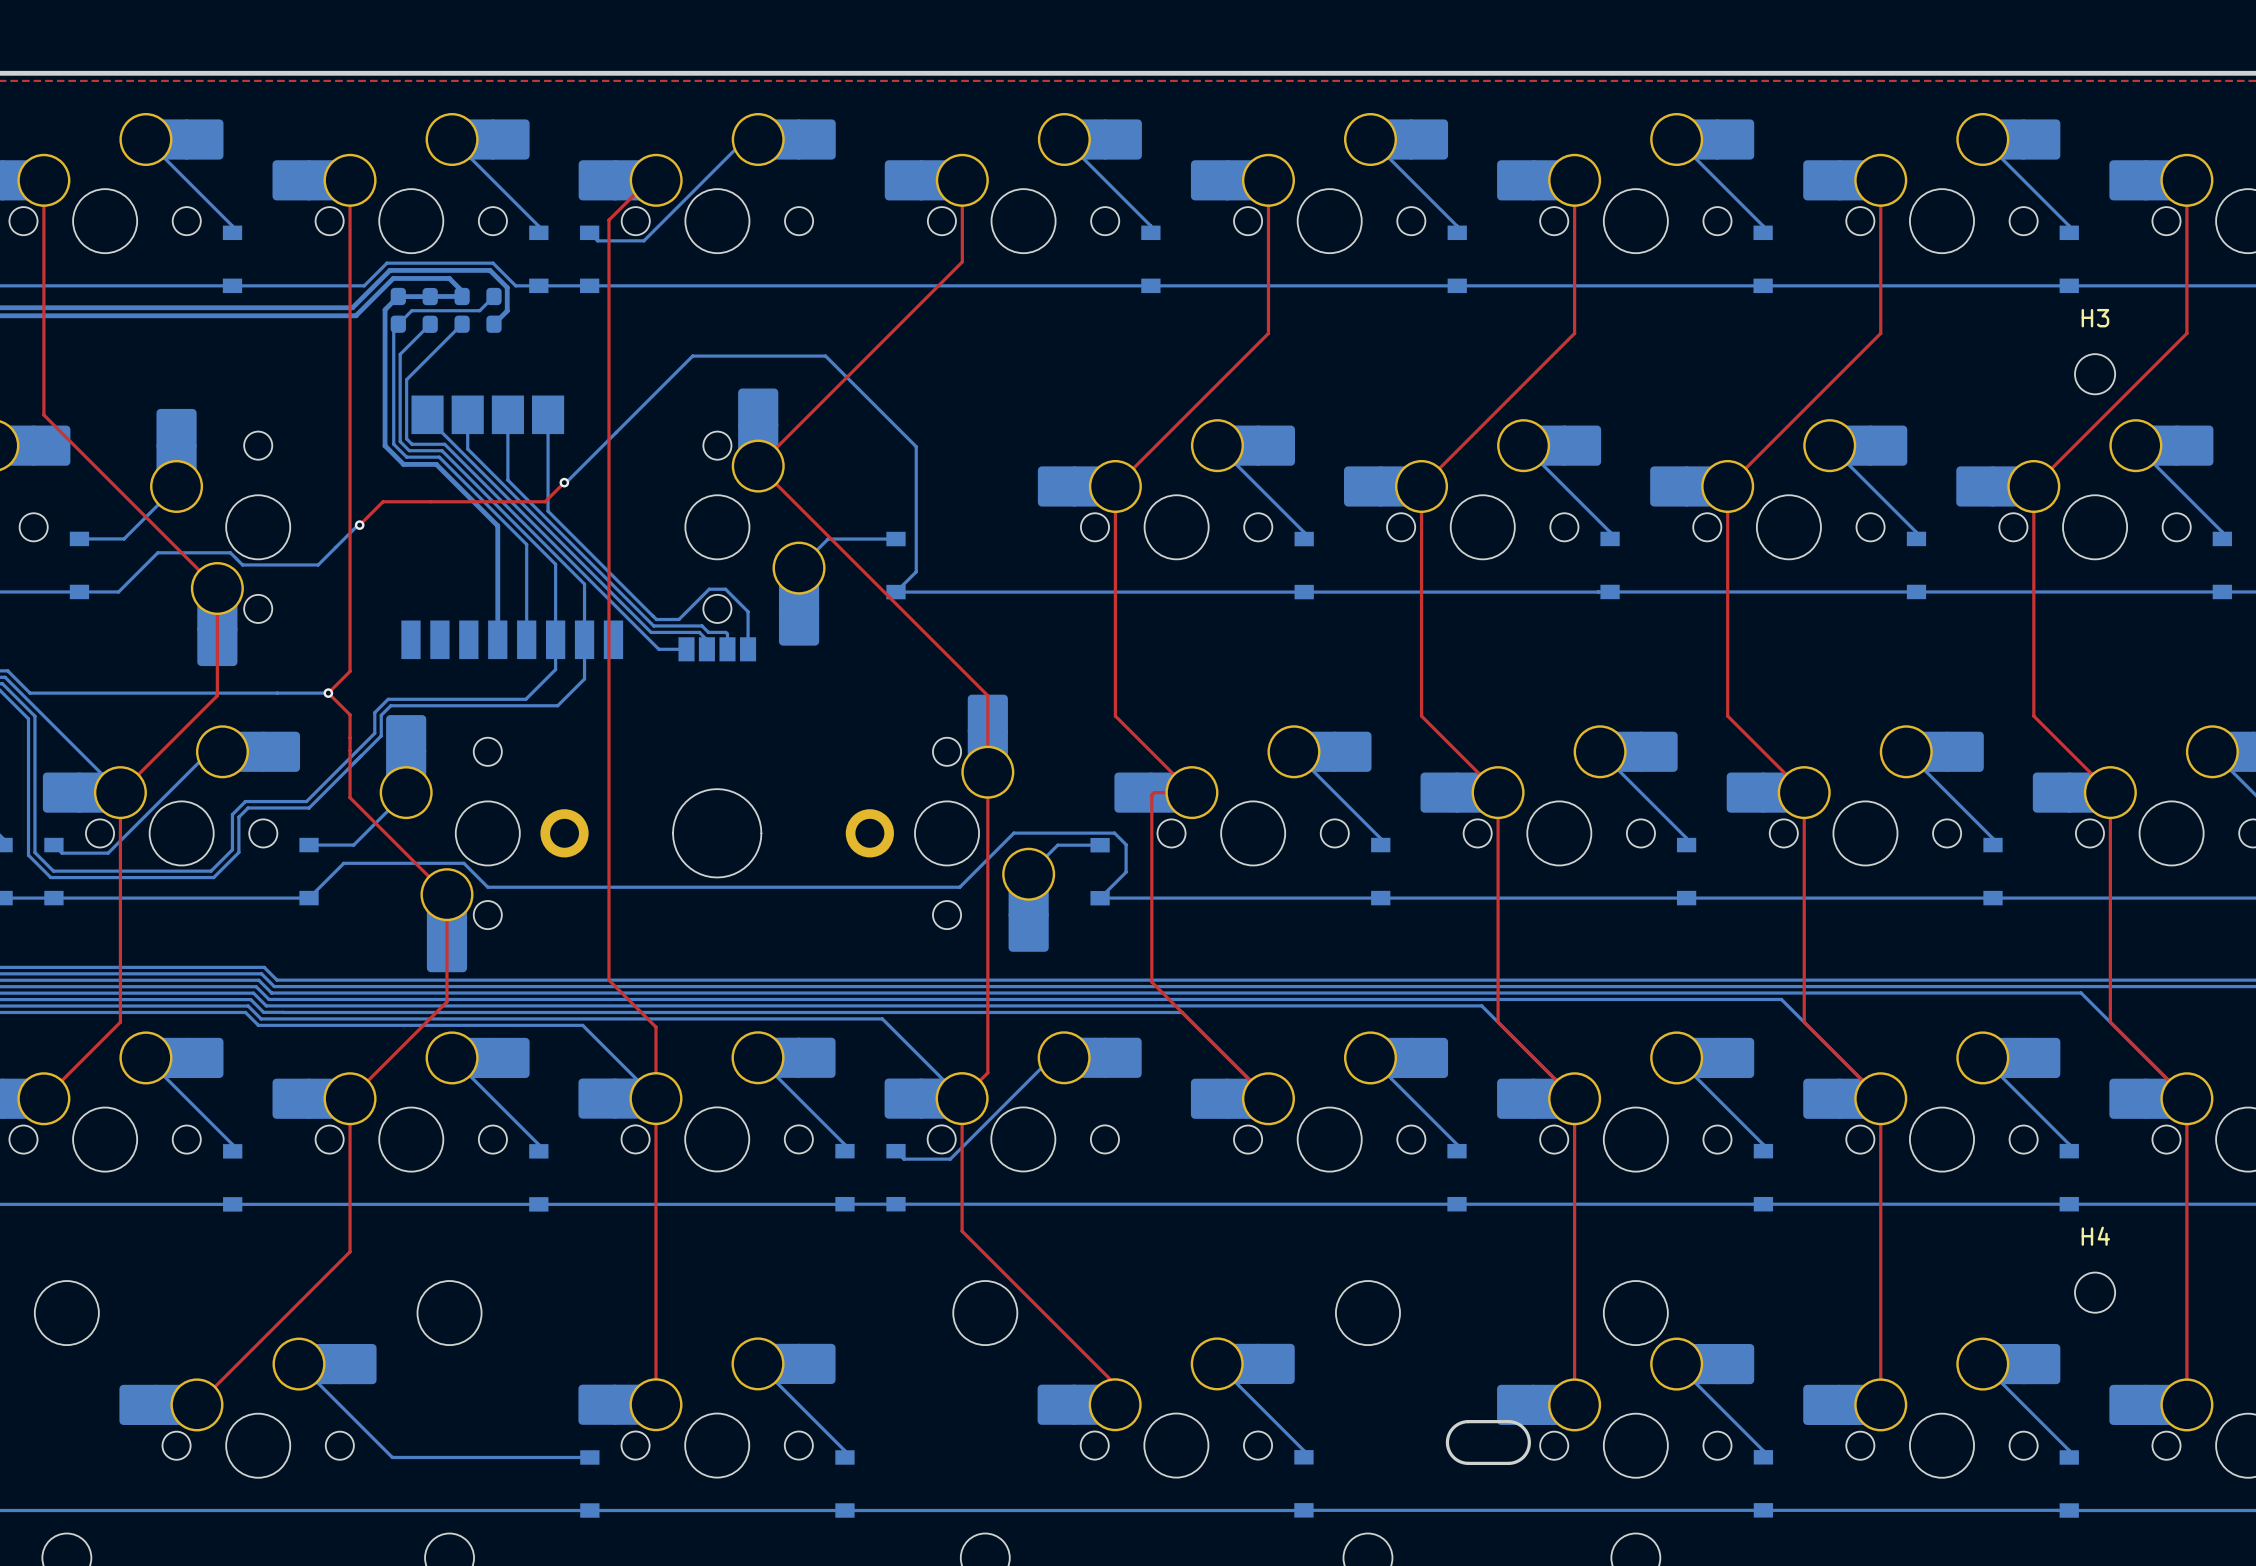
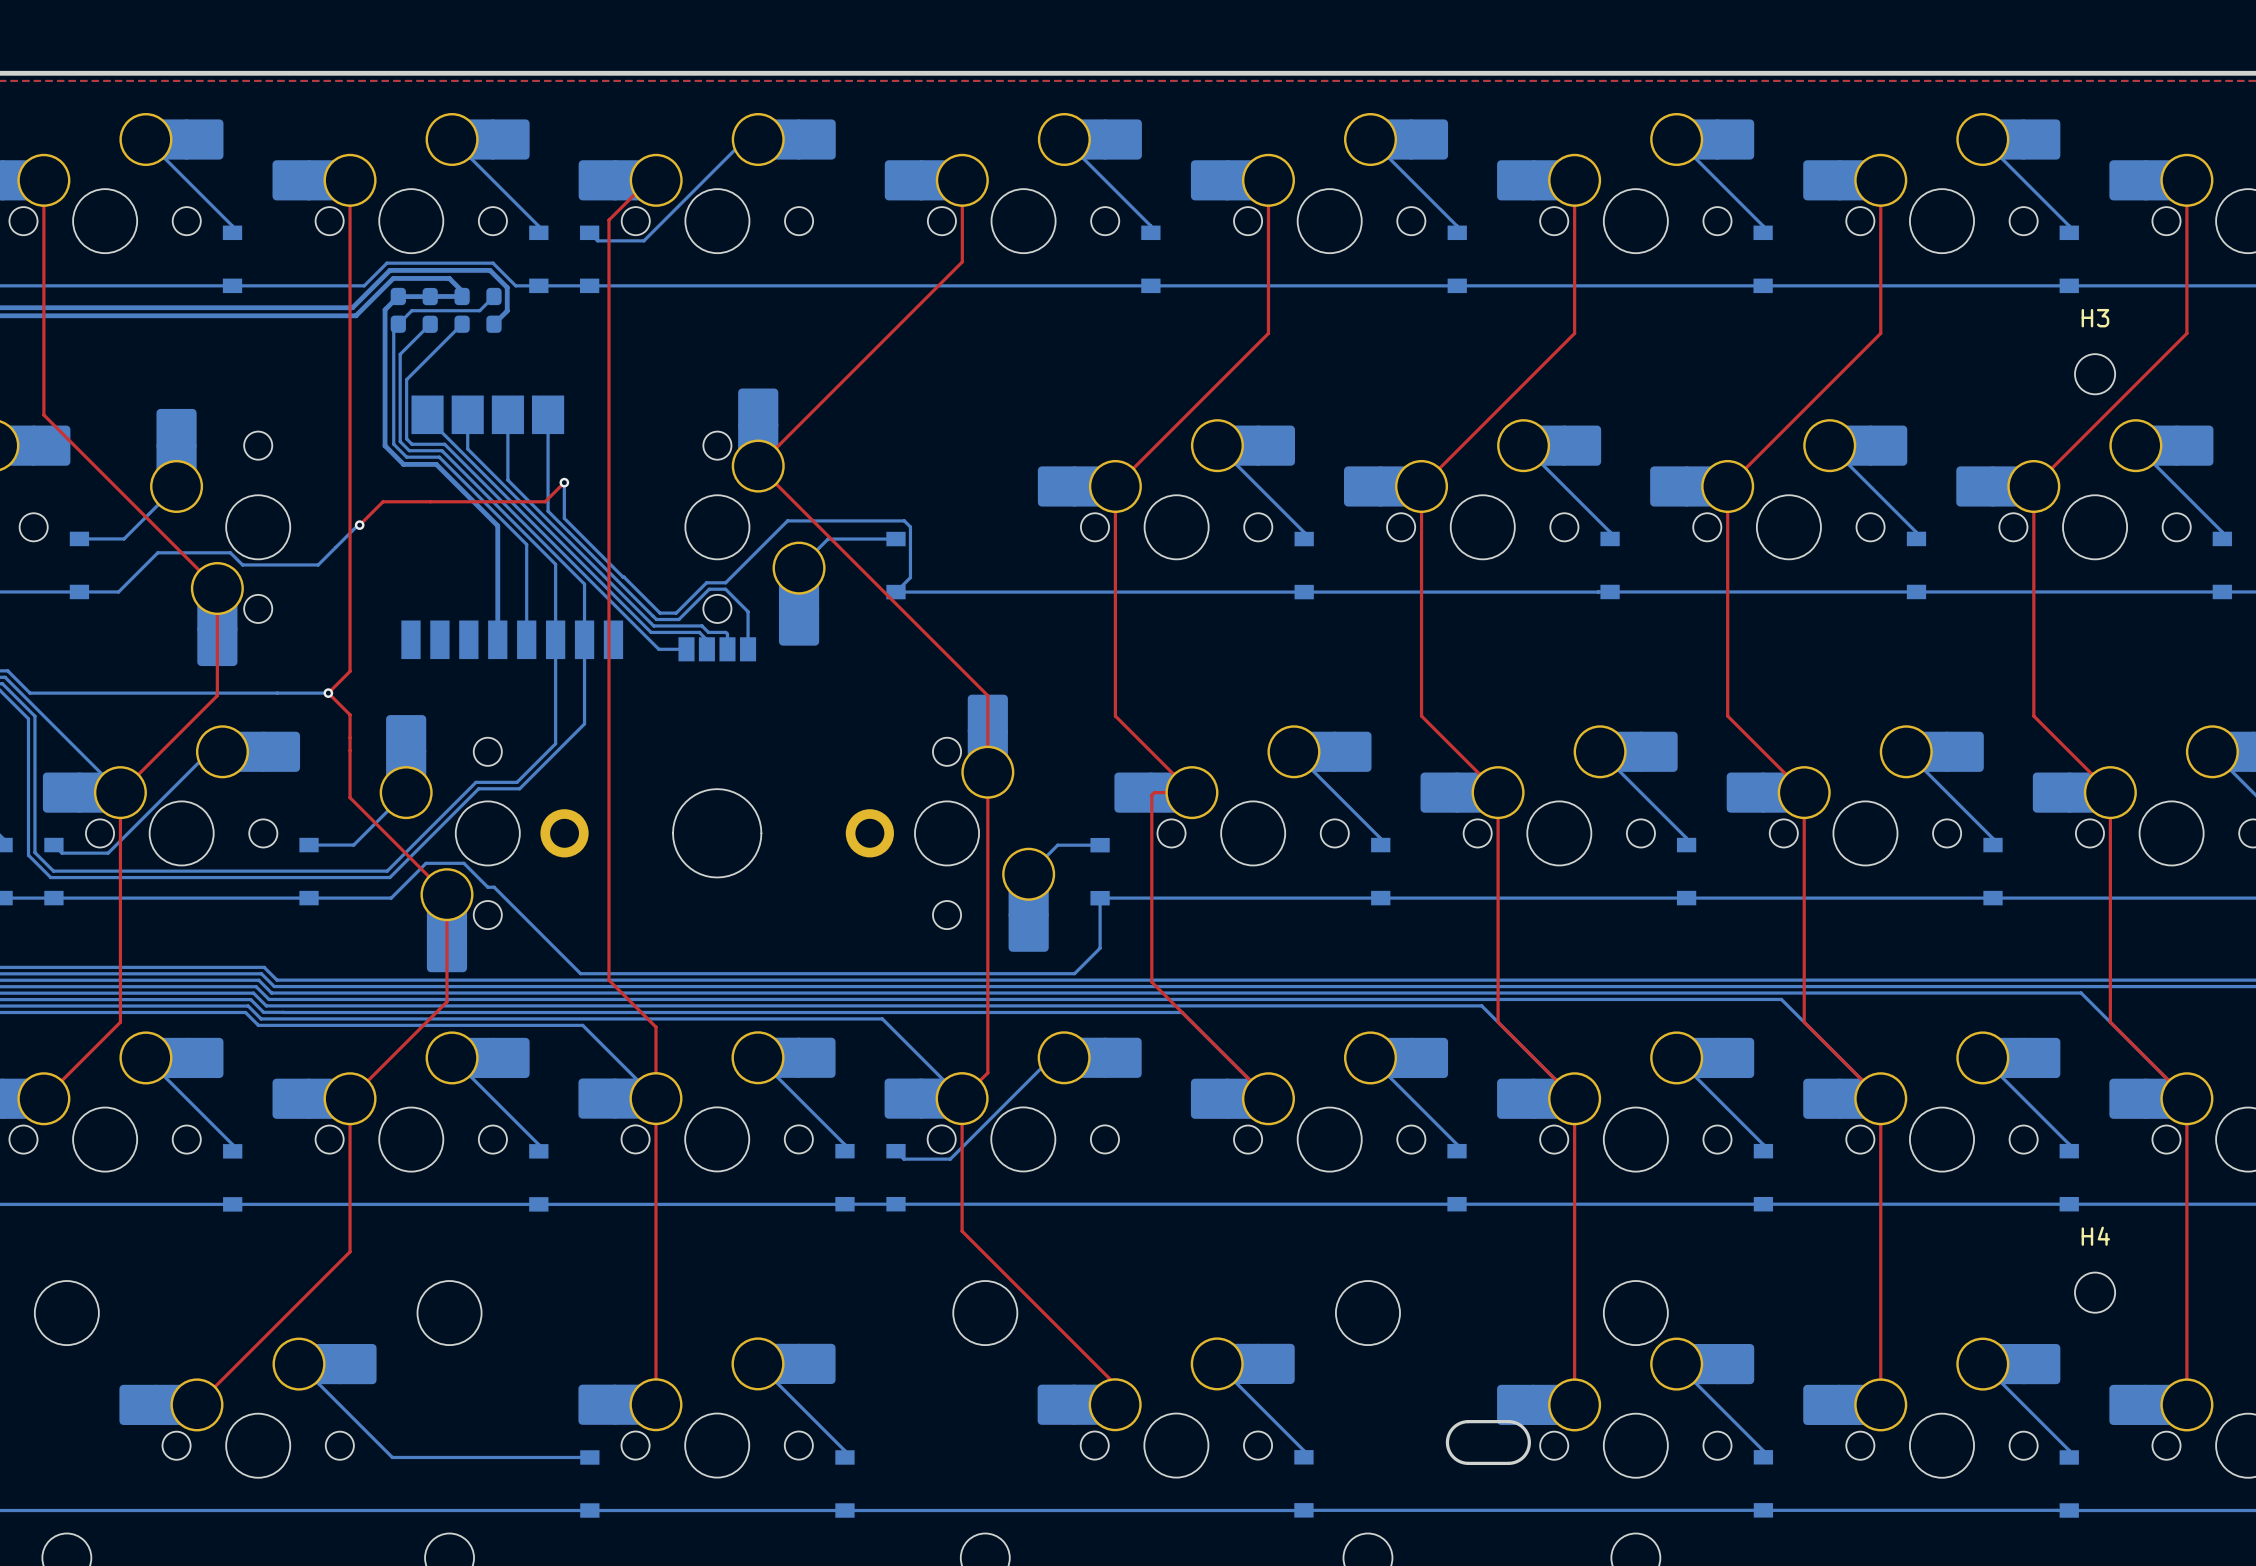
bottom track: (564, 482) (692, 356) (825, 356) (916, 446) (916, 571) (910, 577) -> (564, 482) (564, 518) (660, 613) (676, 613) (706, 582) (725, 582) (787, 520) (904, 520) (910, 526) (910, 577)
bottom track: (555, 669) (525, 699) (388, 699) (374, 712) (374, 733) (306, 801) (245, 801) (232, 814) (232, 849) (211, 871) -> (555, 669) (555, 743) (517, 782) (475, 782) (387, 871) (211, 871)
bottom track: (584, 678) (557, 705) (390, 705) (381, 715) (381, 735) (309, 807) (248, 807) (238, 817) (238, 852) (213, 877) -> (584, 678) (584, 723) (519, 788) (478, 788) (389, 877) (213, 877)
bottom track: (426, 863) (343, 863) (309, 898) -> (426, 863) (391, 898) (309, 898)
bottom track: (494, 887) (959, 887) (1013, 833) (1114, 833) (1126, 844) (1126, 872) (1100, 898) -> (494, 887) (580, 973) (1074, 973) (1100, 948) (1100, 898)

